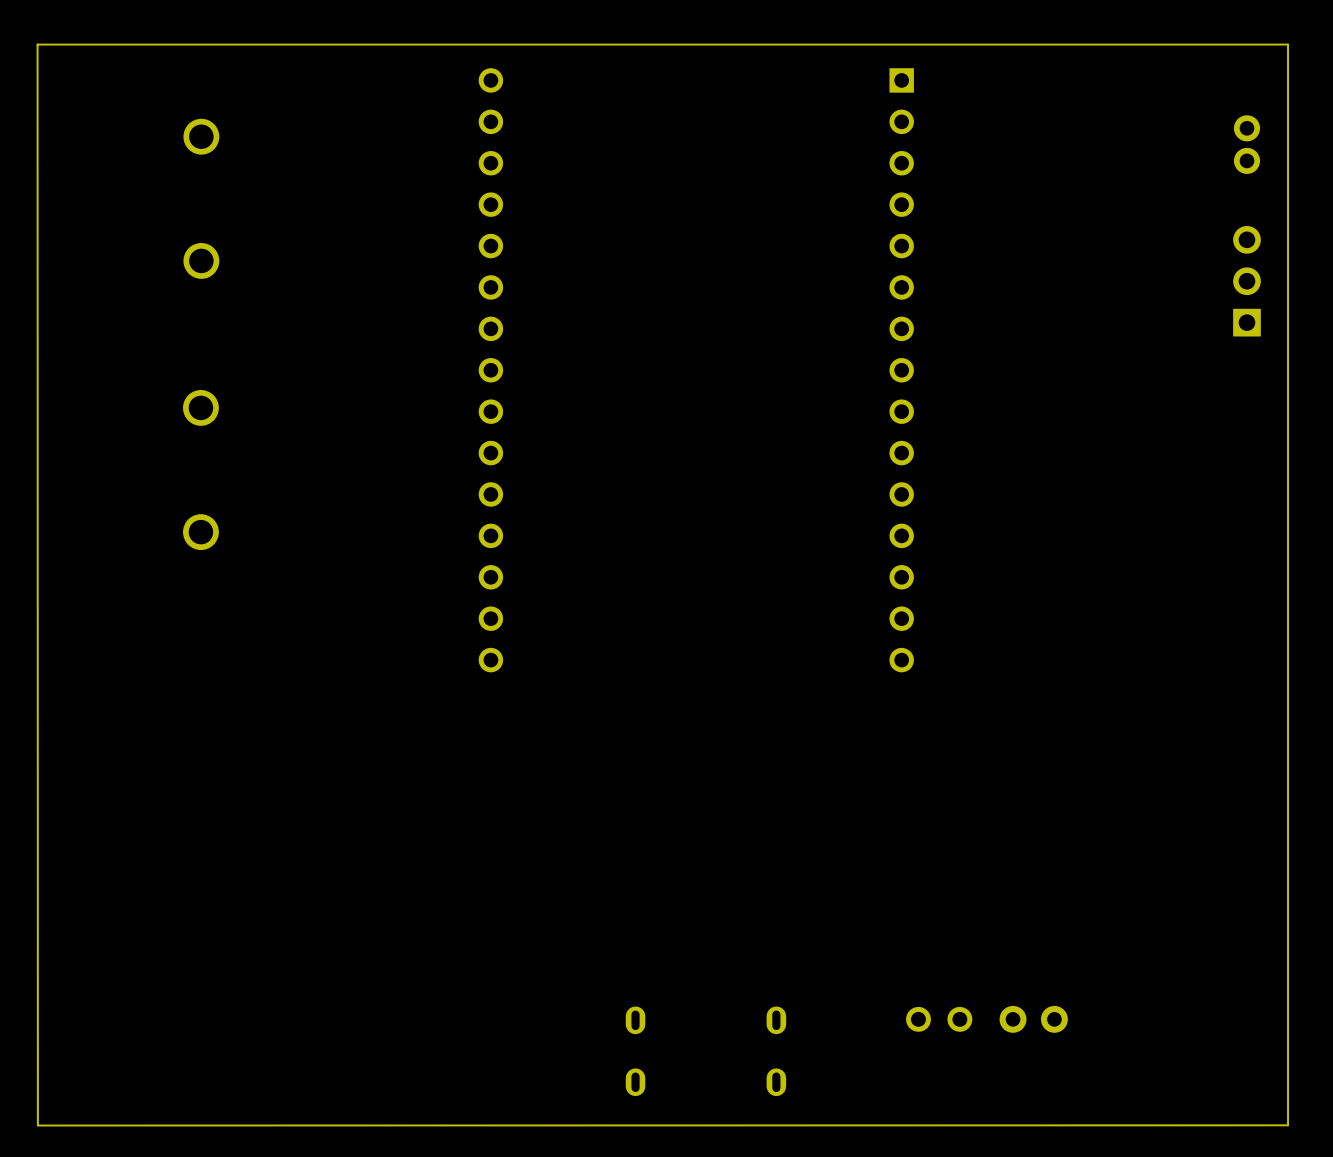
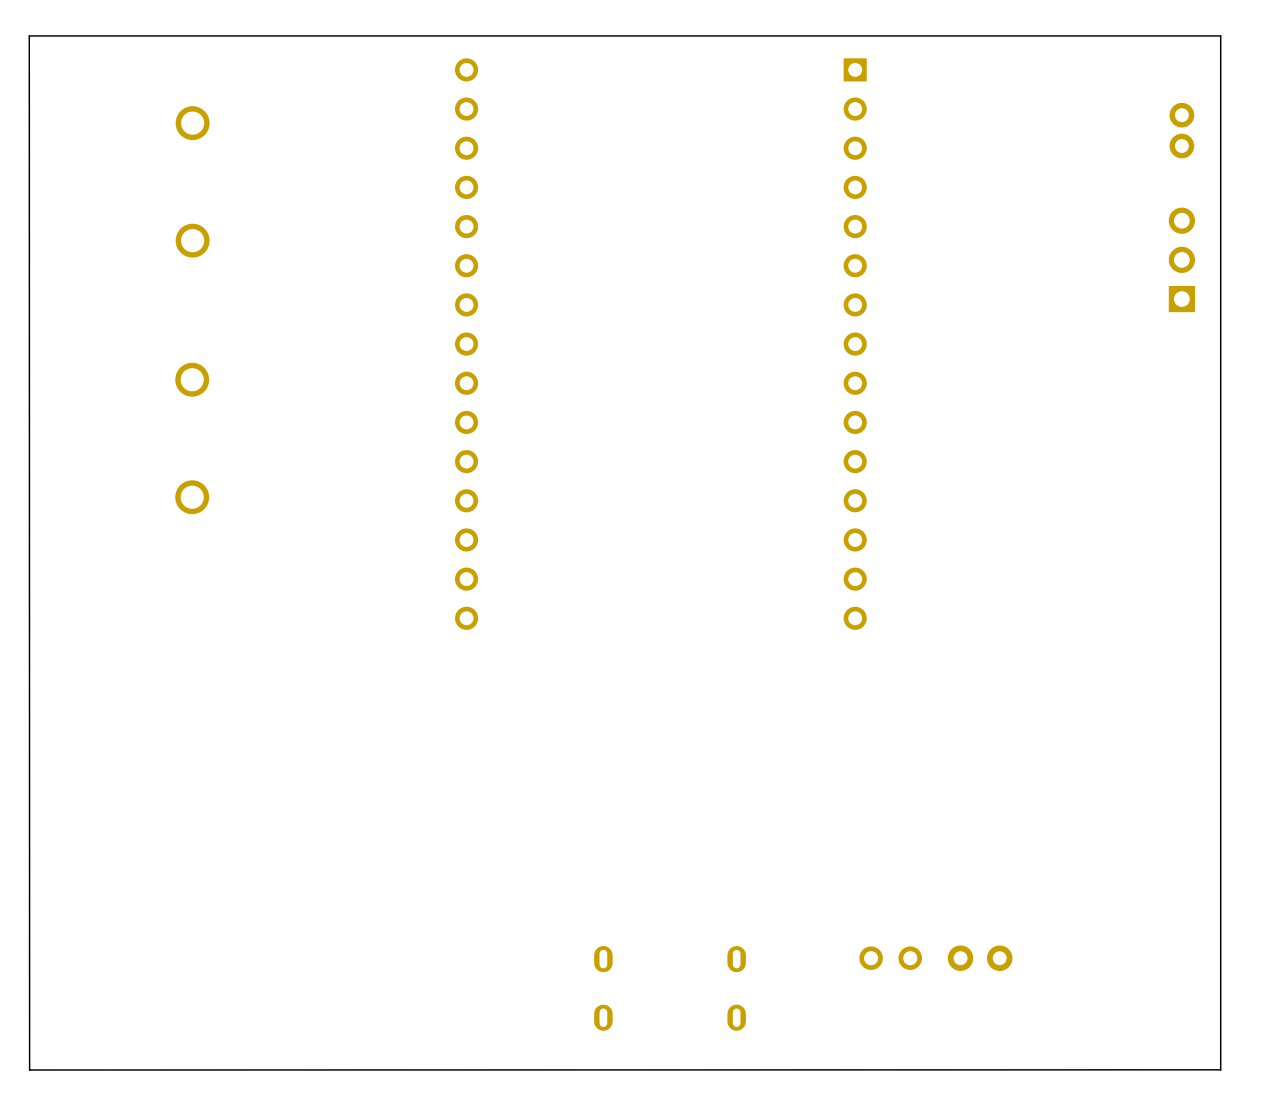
board edge: (37, 44) (37, 1125) -> none
board edge: (1288, 1125) (37, 1125) -> (1220, 1058) (1220, 1069) (29, 1070) (29, 35) (37, 35)

